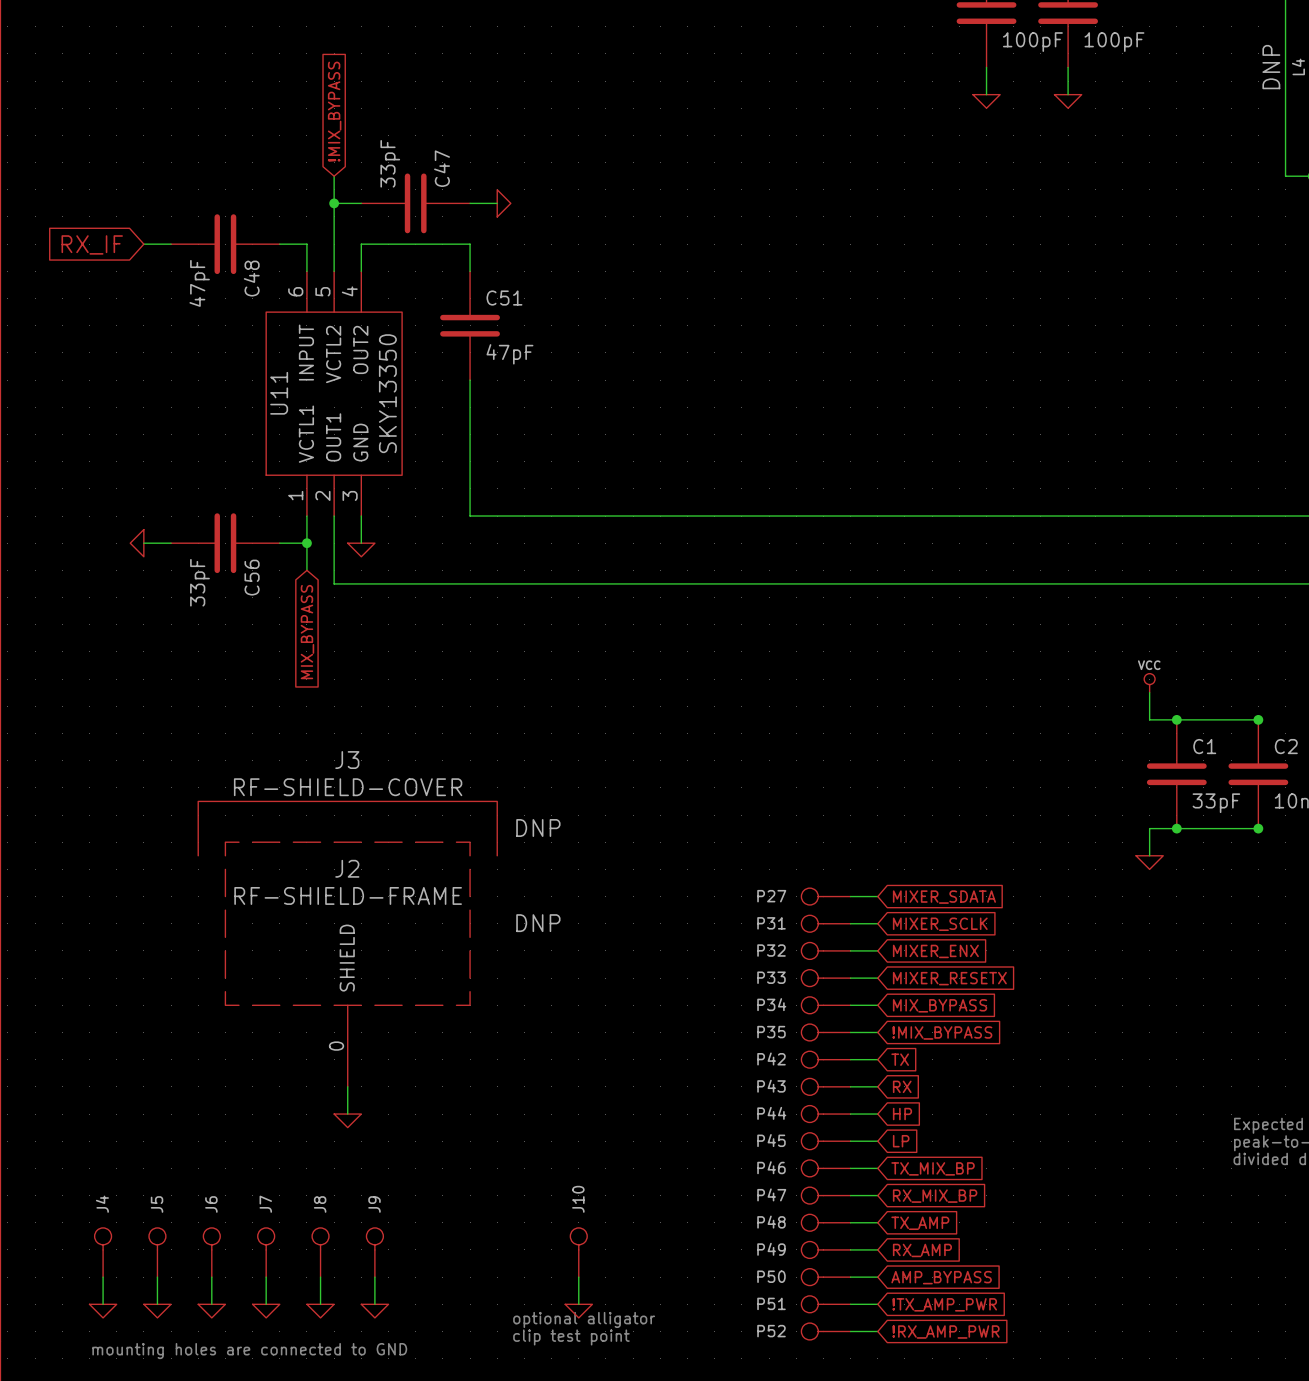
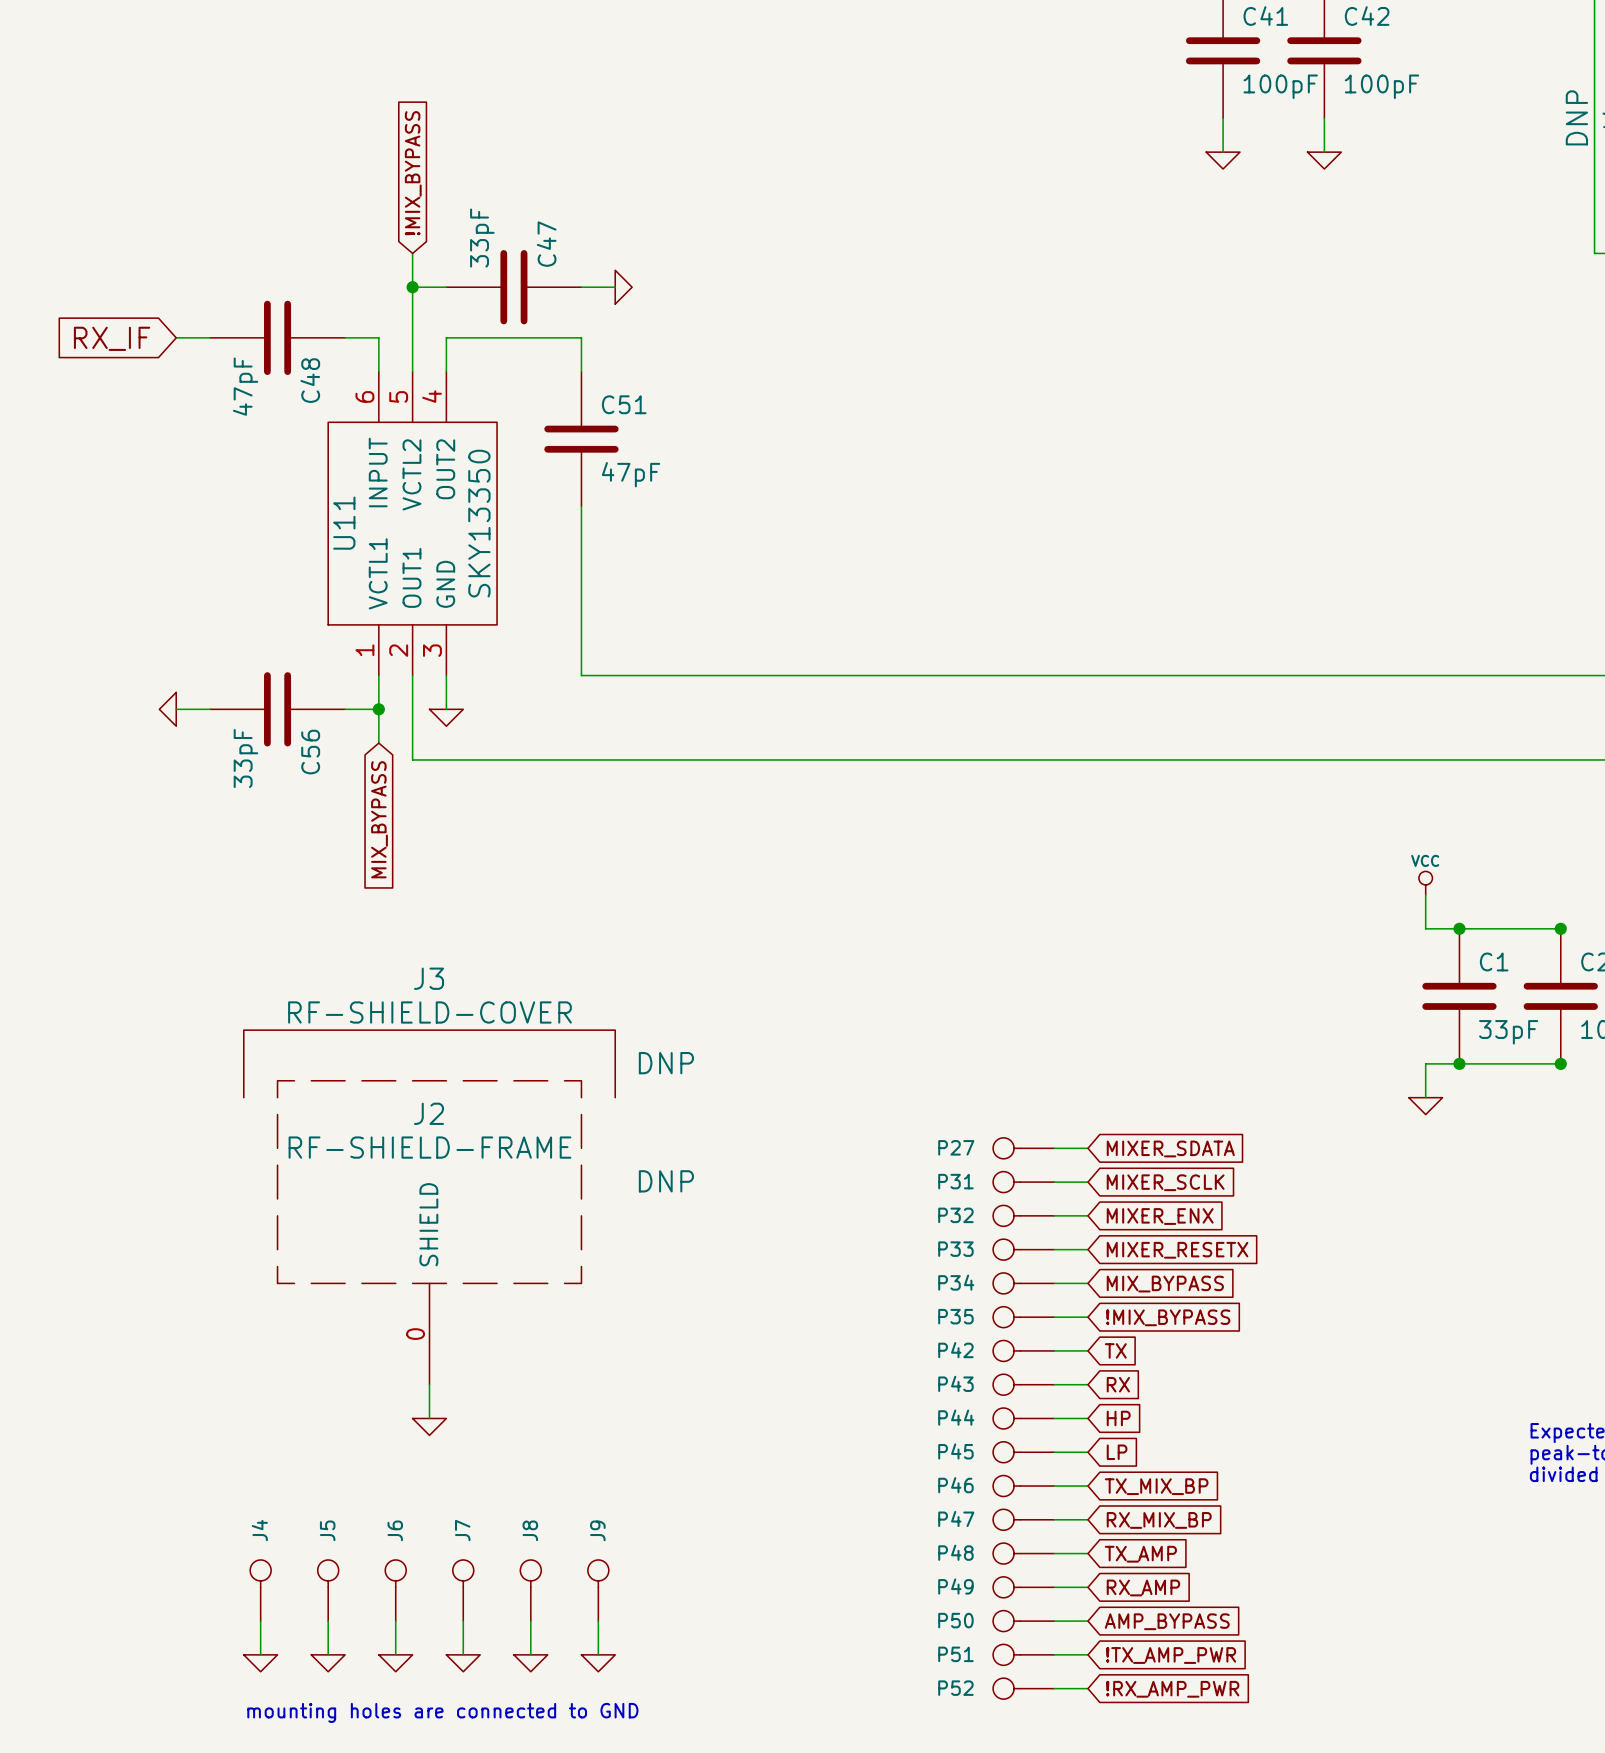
J6 name: J6 (211, 1204) -> J4 (259, 1530)
J7 name: J7 (265, 1204) -> J5 (327, 1530)
J8 name: J8 (320, 1204) -> J6 (395, 1530)
J9 name: J9 (374, 1204) -> J7 (462, 1530)
J4: (103, 1252) -> none
J5: (157, 1252) -> none
J8: none -> (530, 1590)
J9: none -> (598, 1590)
J10: (578, 1252) -> none
wire: (103, 1277) (103, 1304) -> none
wire: (157, 1277) (157, 1304) -> none
wire: none -> (530, 1621) (530, 1654)
wire: (578, 1277) (578, 1304) -> (598, 1621) (598, 1654)
power symbol: (103, 1311) -> none
power symbol: (157, 1311) -> none
power symbol: none -> (530, 1663)
power symbol: none -> (598, 1663)
power symbol: (578, 1311) -> none
text: optional alligator (584, 1319) -> none
text: clip test point (571, 1337) -> none
text position: mounting holes are connected to GND (249, 1351) -> mounting holes are connected to GND (442, 1712)

